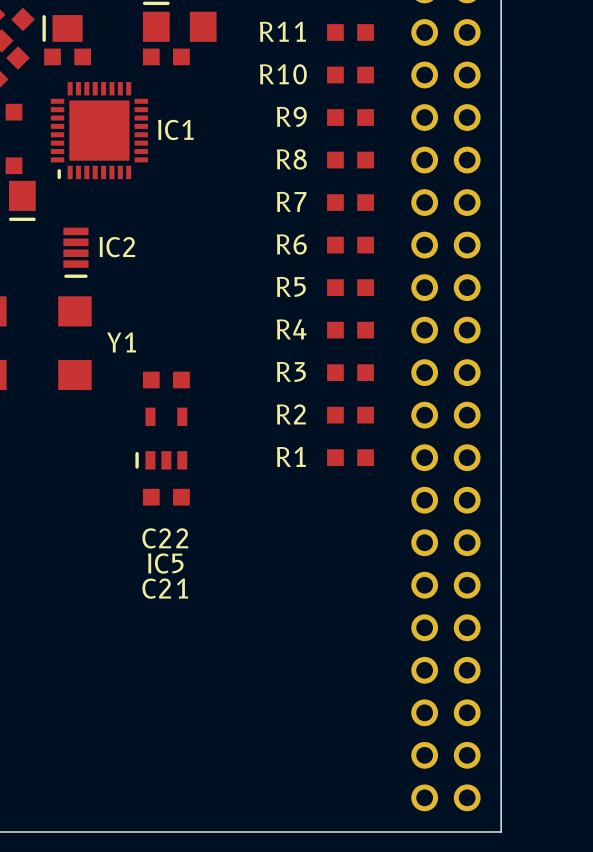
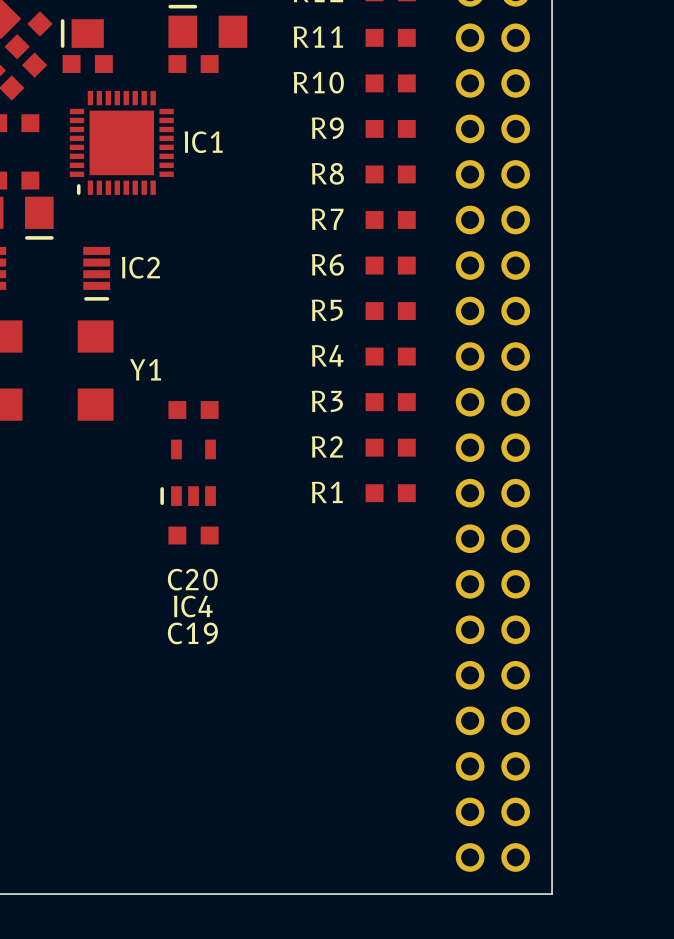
C22 name: C22 (165, 538) -> C20 (192, 579)
IC5 name: IC5 (165, 563) -> IC4 (193, 606)
C21 name: C21 (165, 588) -> C19 (192, 633)

